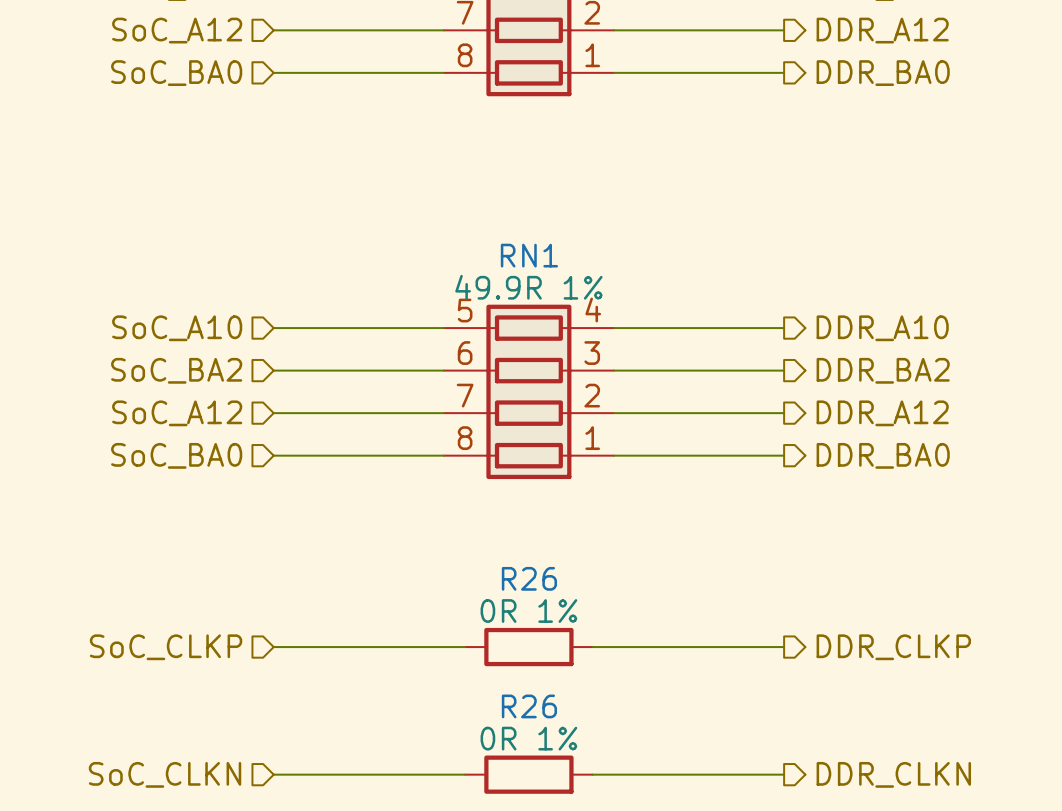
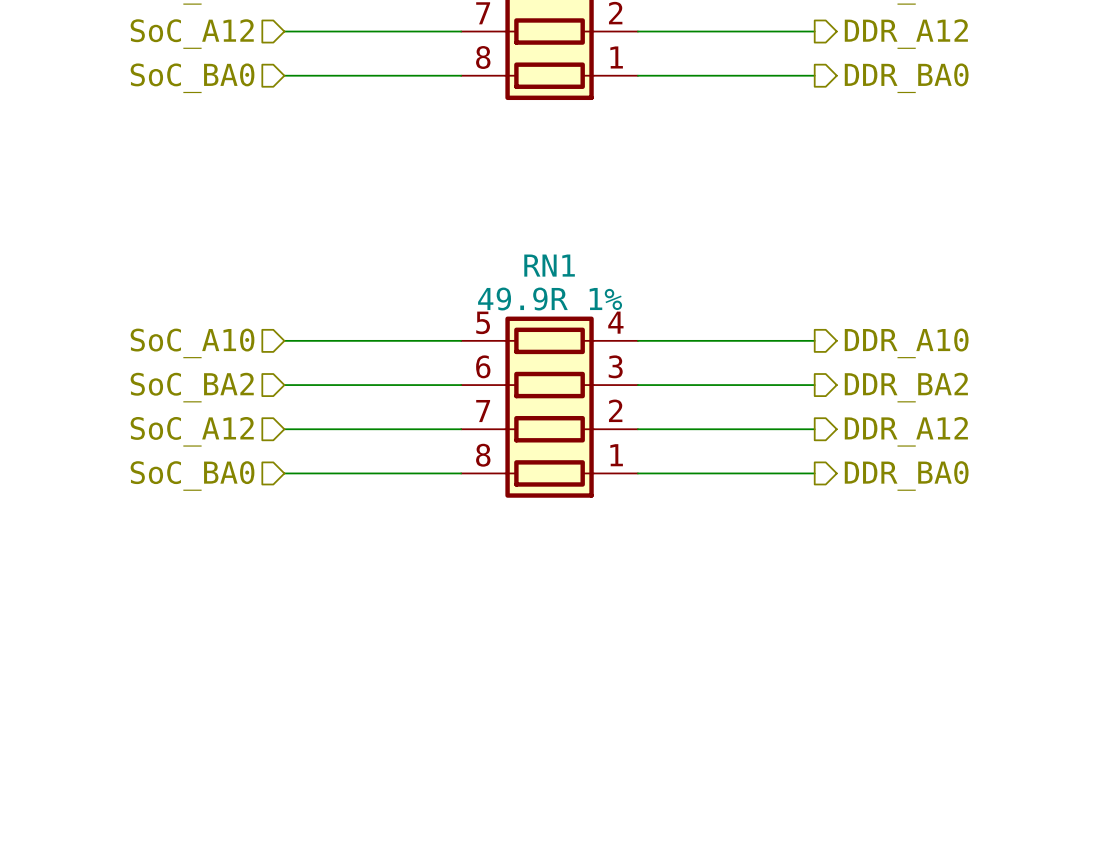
hierarchical label: SoC_CLKP (166, 647) -> none
wire: (273, 647) (465, 647) -> none
R26: 0R 1% (528, 647) -> none
wire: (592, 647) (784, 647) -> none
hierarchical label: DDR_CLKP (893, 647) -> none
hierarchical label: SoC_CLKN (165, 774) -> none
wire: (273, 774) (465, 774) -> none
R26: 0R 1% (528, 774) -> none
wire: (592, 774) (784, 774) -> none
hierarchical label: DDR_CLKN (893, 774) -> none

